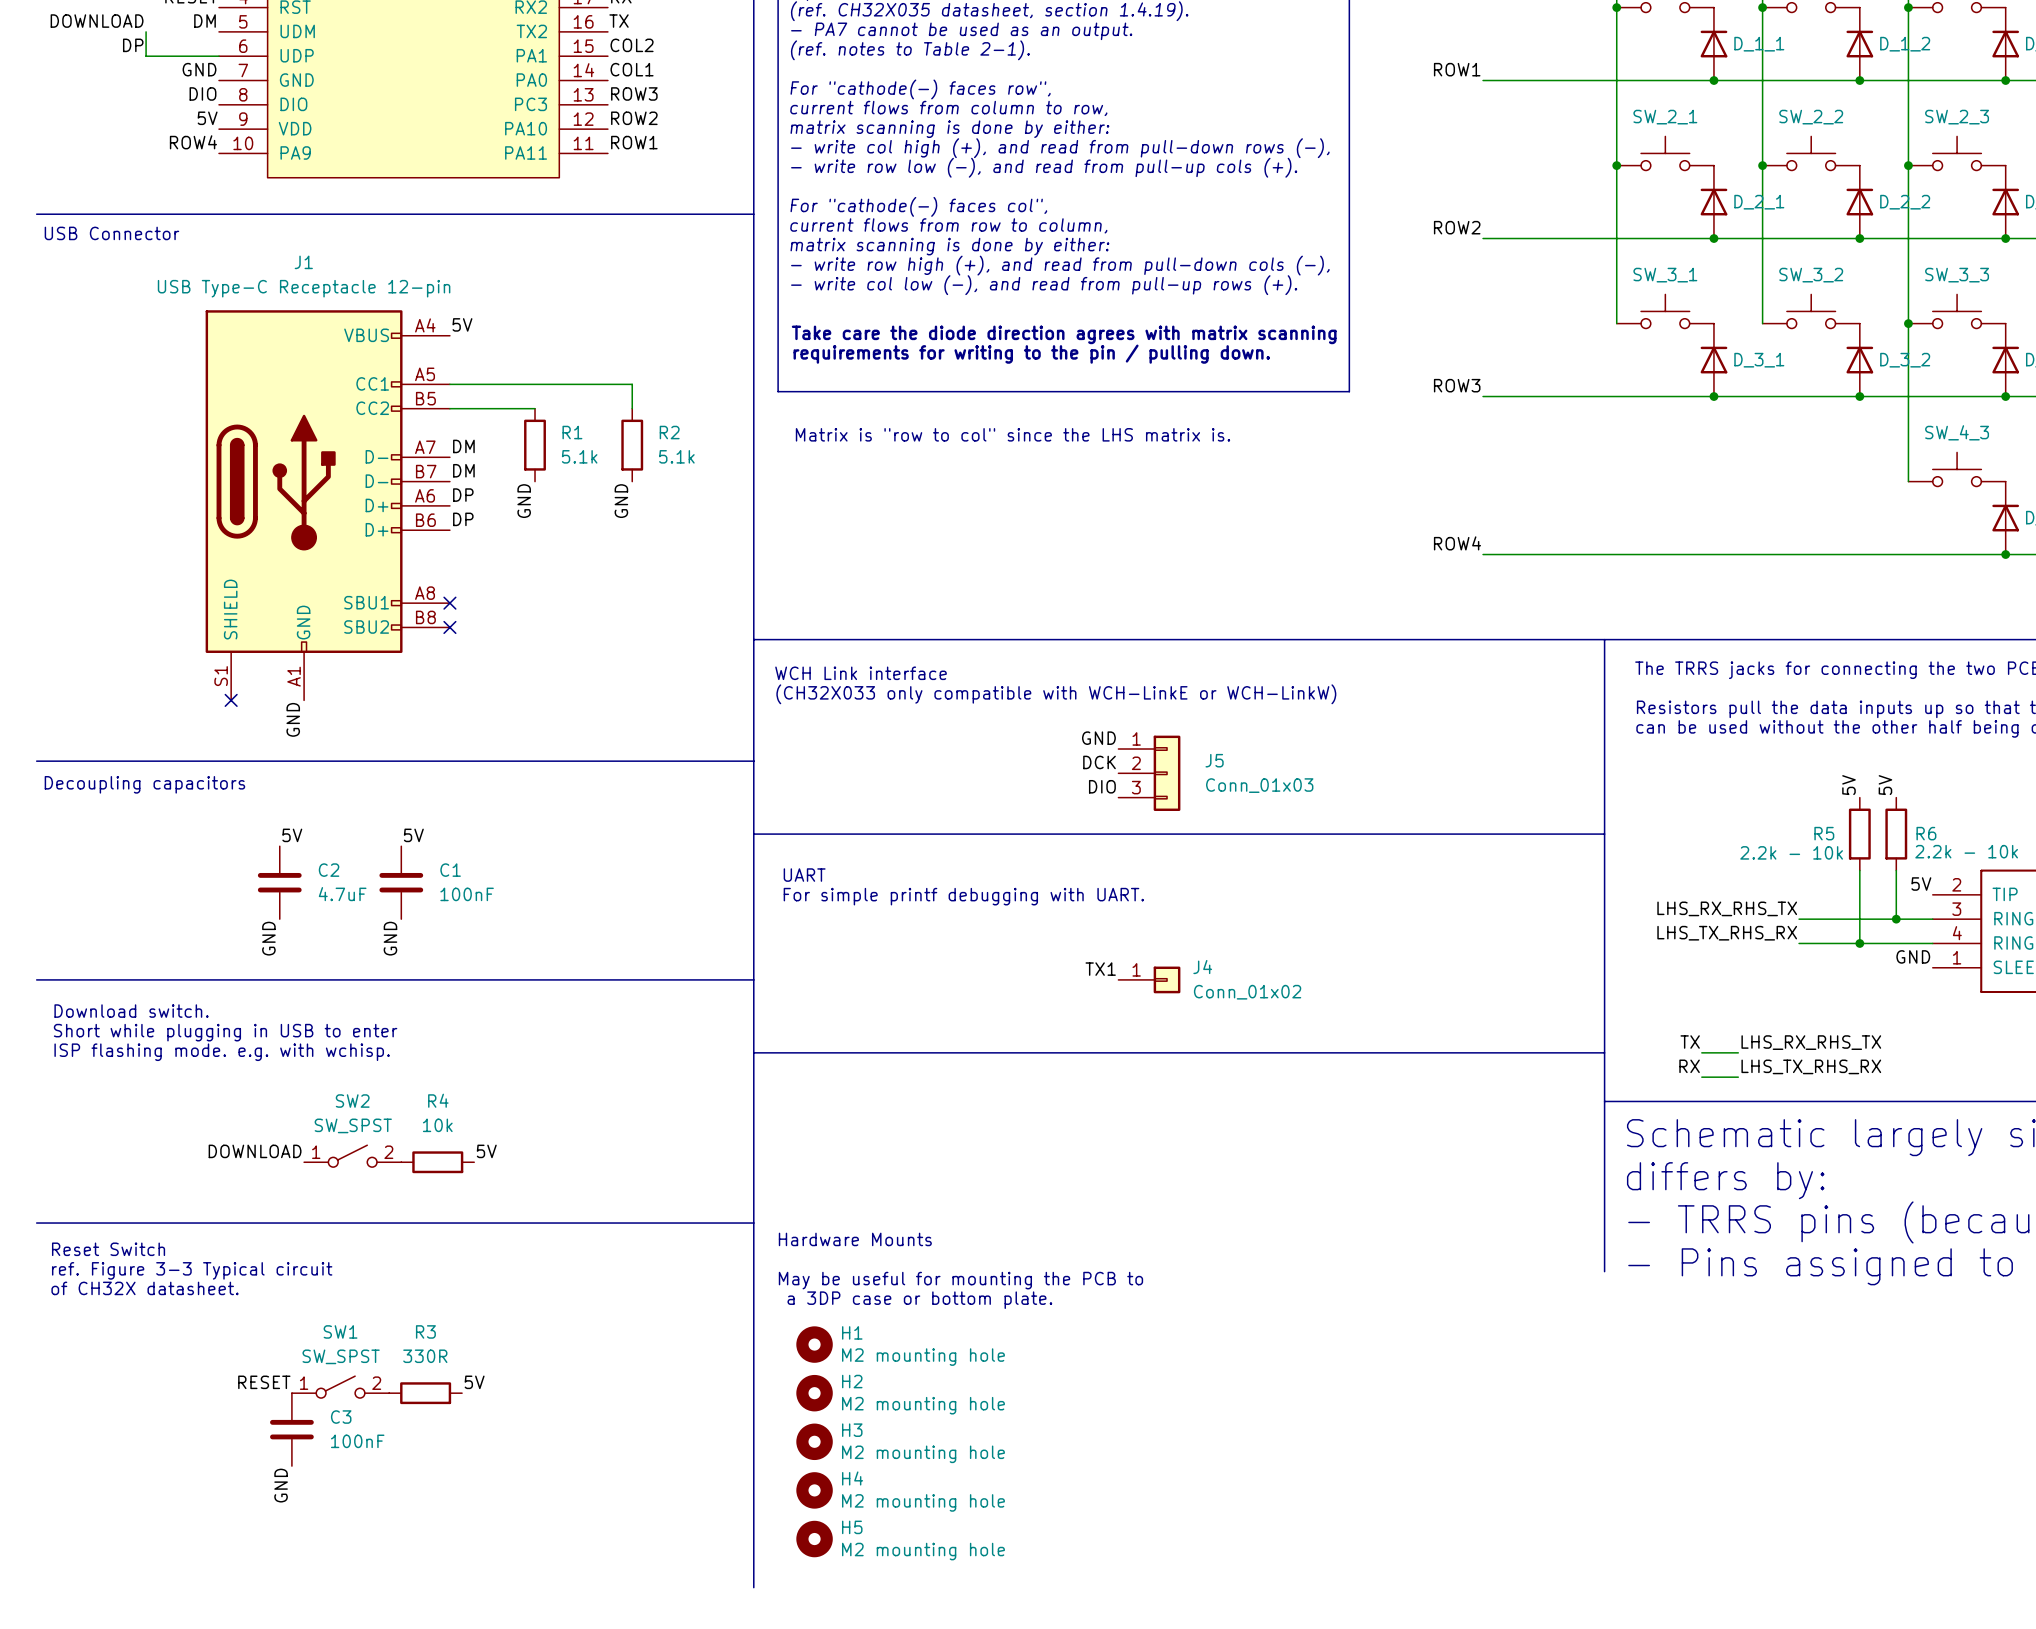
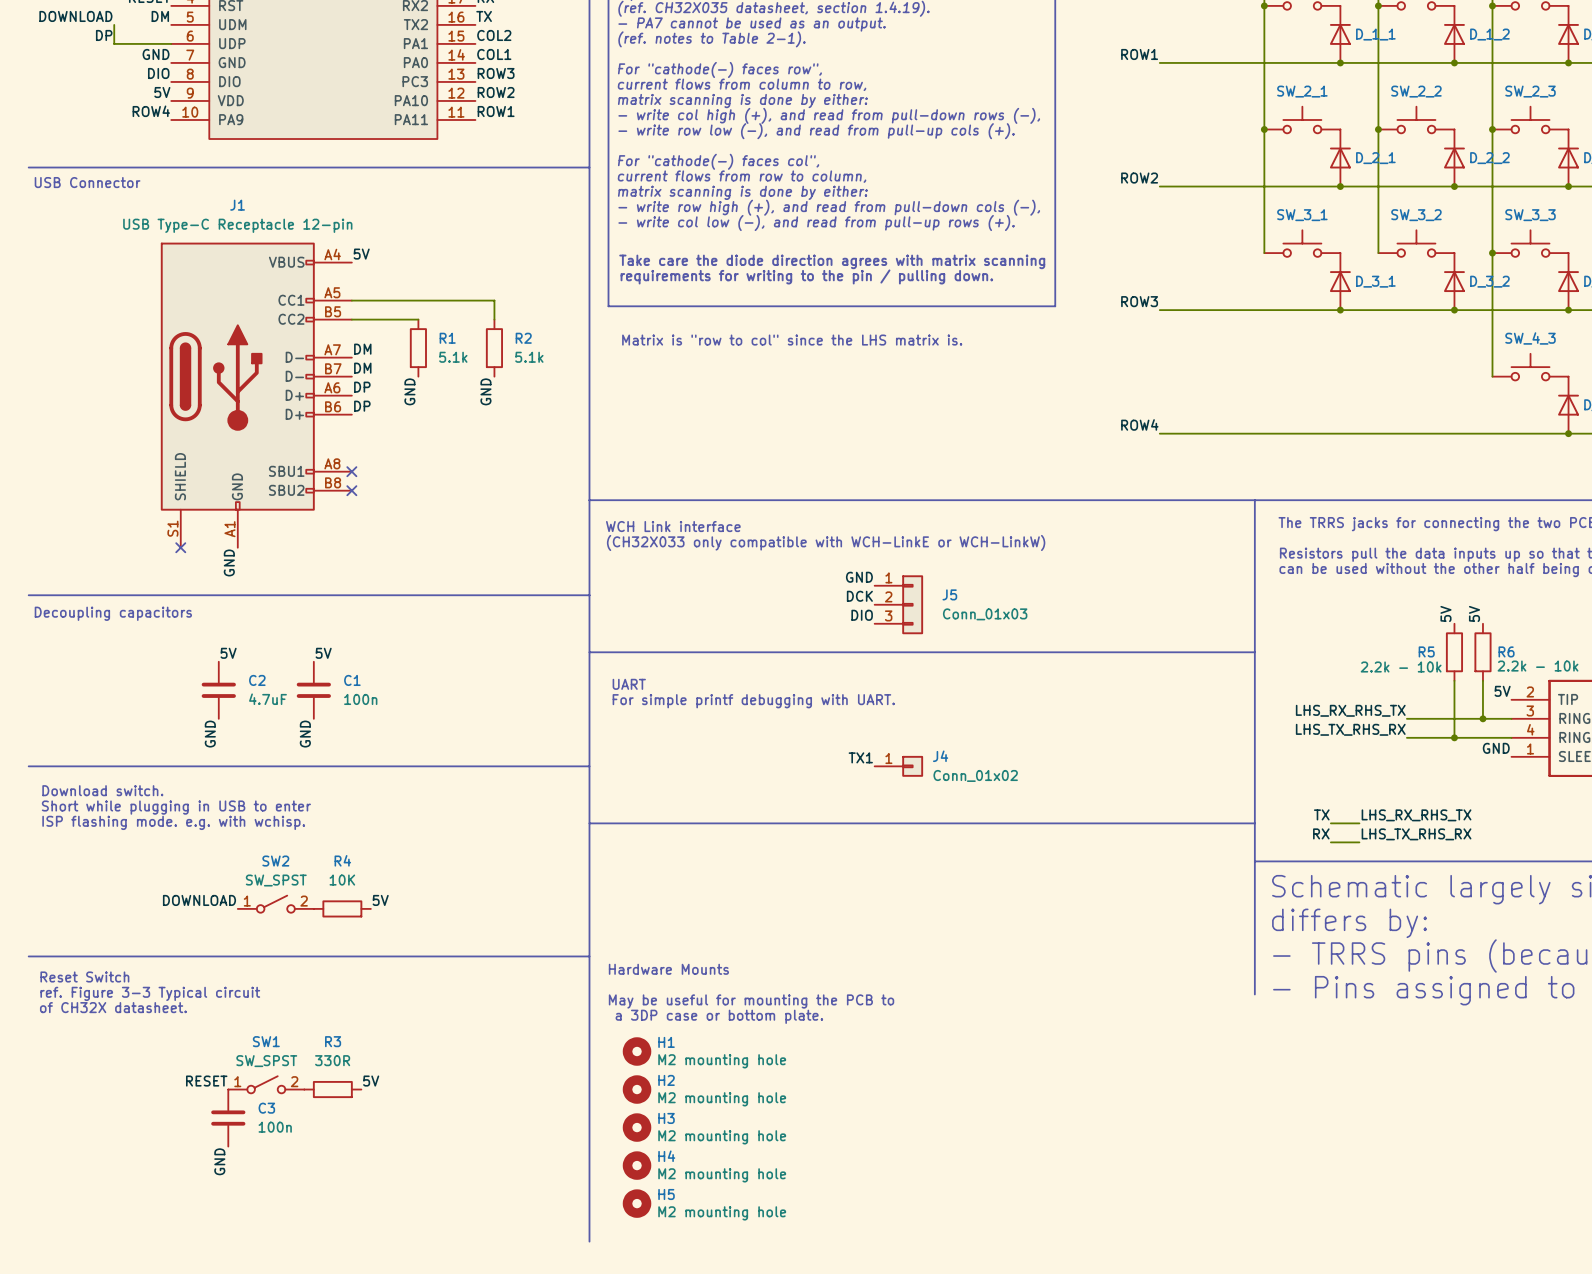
C1 value: 100nF (467, 894) -> 100n (360, 699)
R4 value: 10k (437, 1125) -> 10K (342, 880)
C3 value: 100nF (357, 1441) -> 100n (275, 1127)

